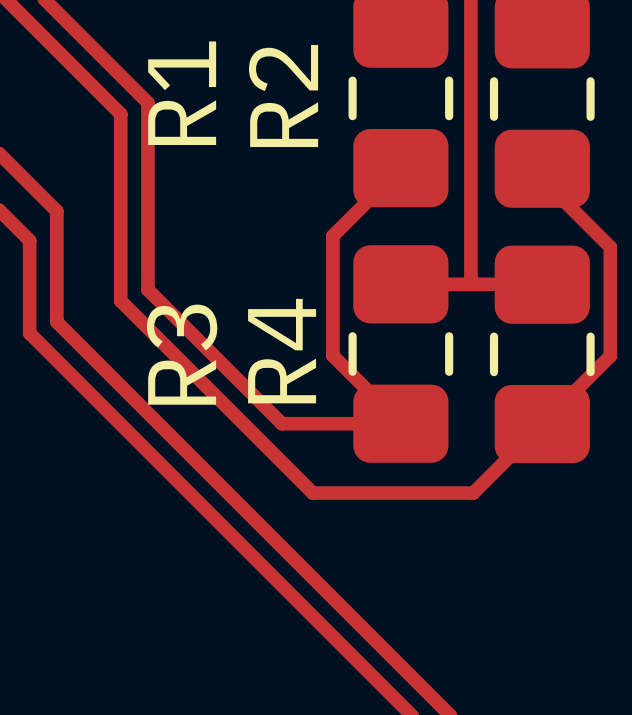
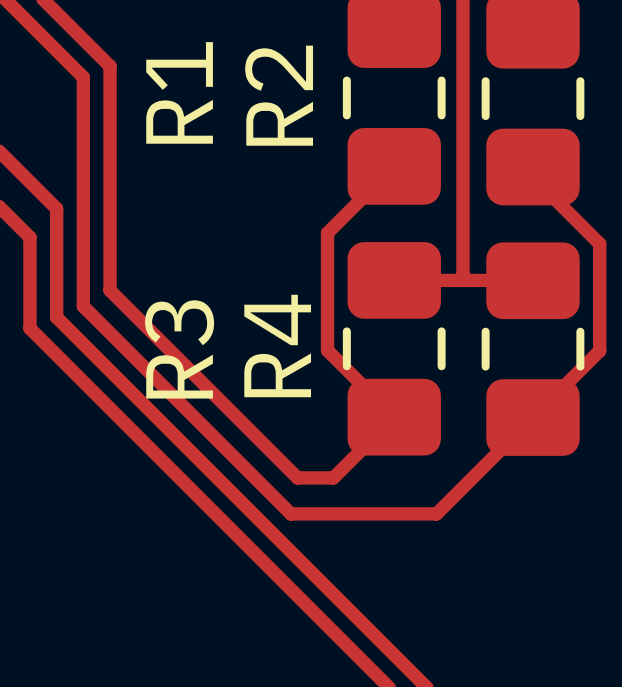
track: (111, 66) (147, 102) (147, 289) (281, 423) (400, 423) -> (110, 66) (110, 290) (297, 477) (333, 477) (394, 417)
track: (84, 77) (120, 114) (120, 301) (312, 493) (473, 493) -> (83, 77) (83, 306) (290, 513) (436, 513) (465, 485)

